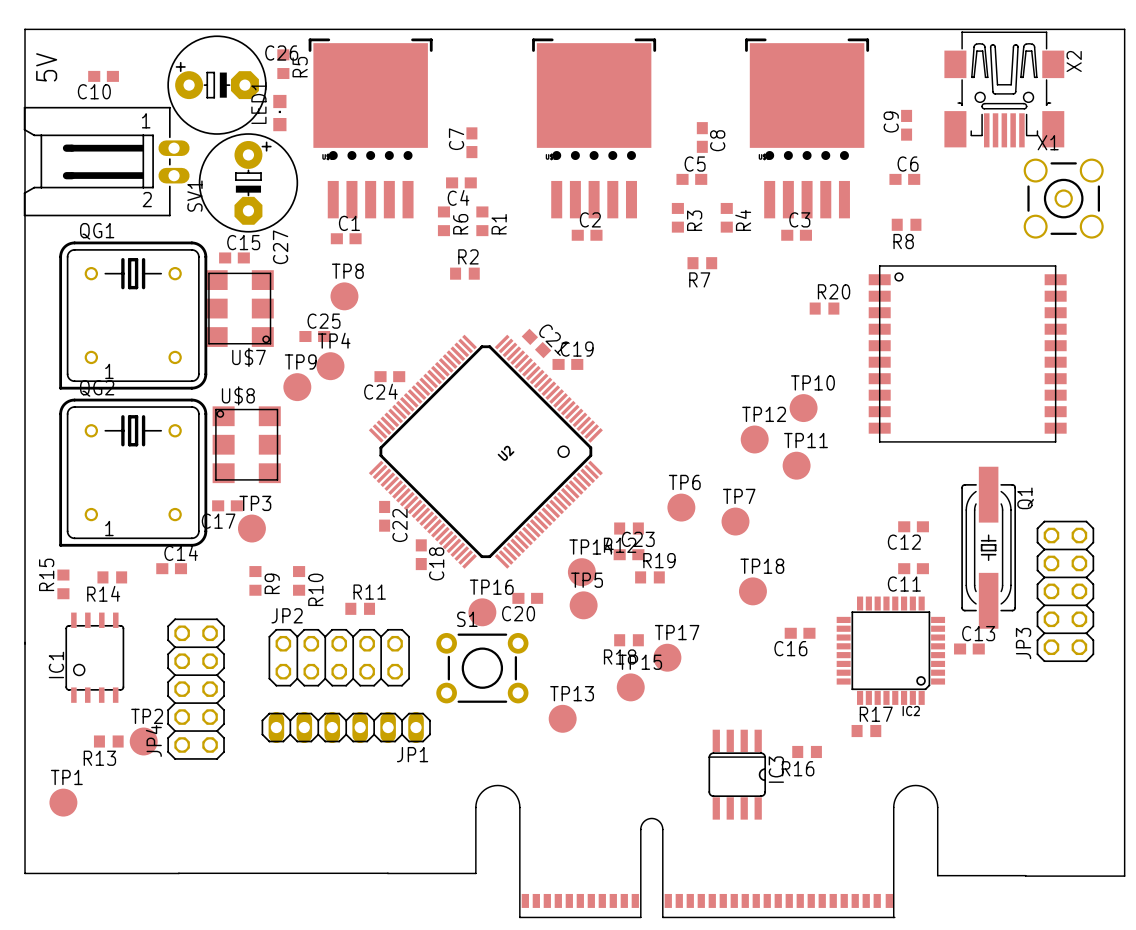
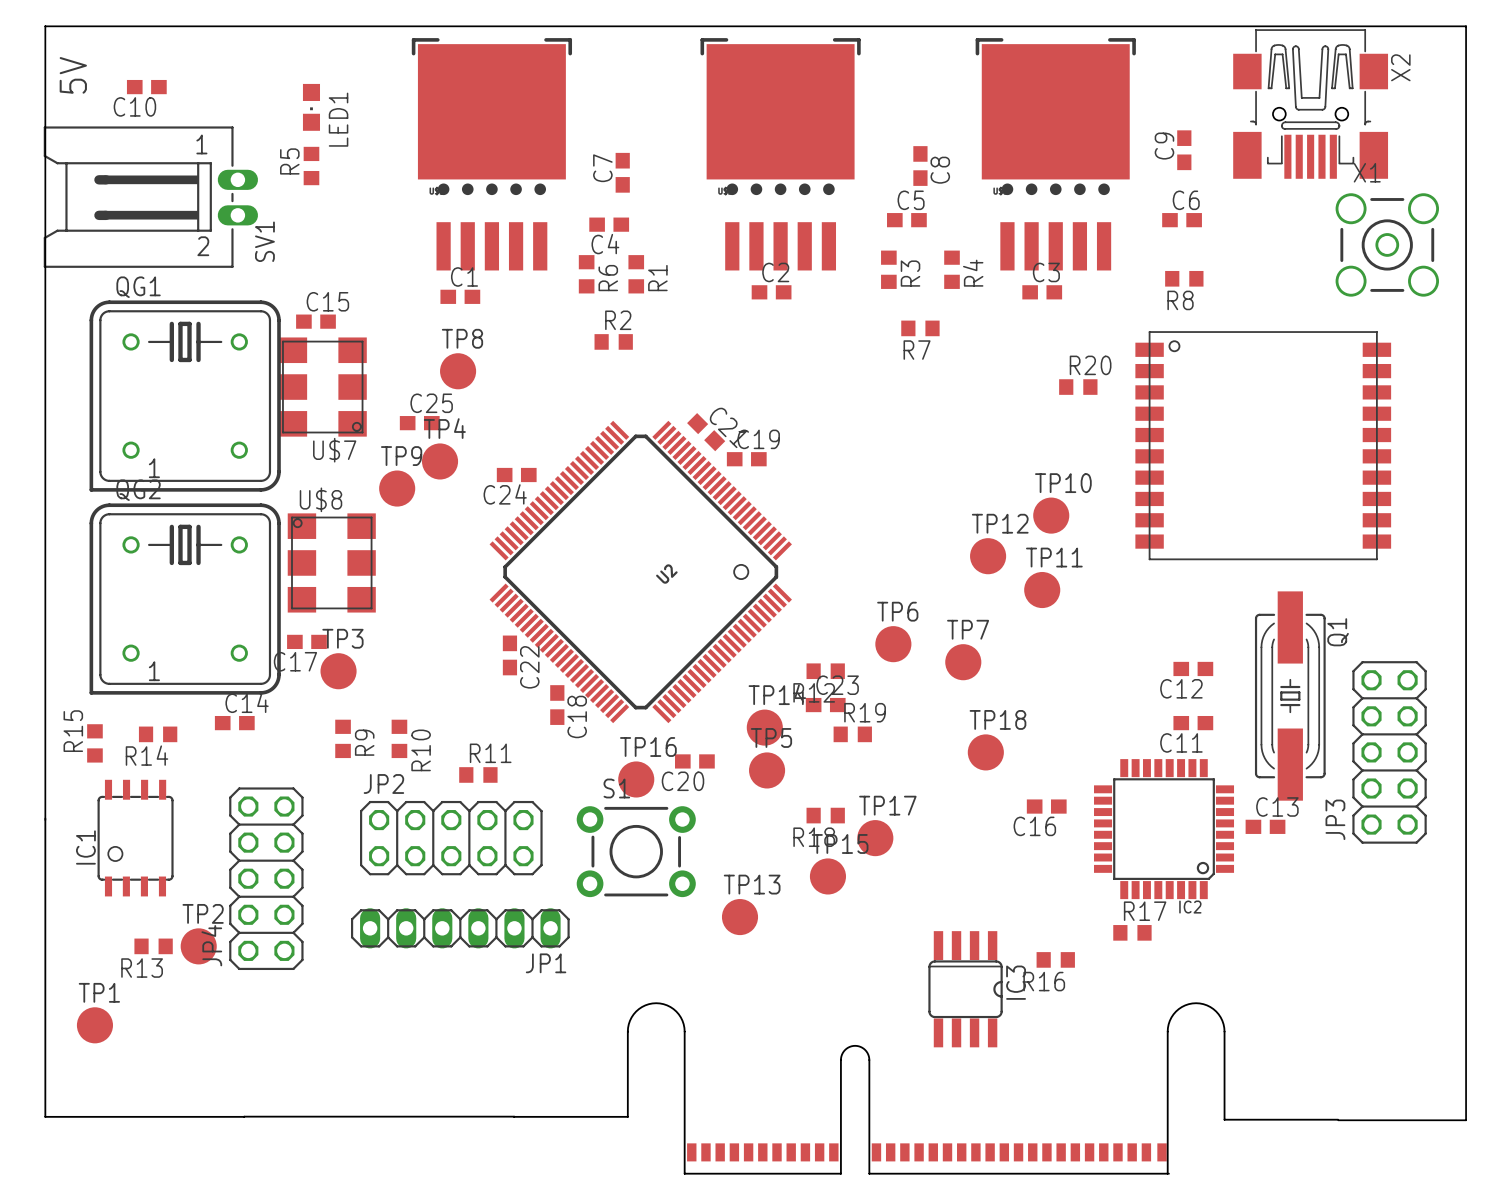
R5 position: (283, 64) -> (311, 166)
R5 name position: R5 (300, 67) -> R5 (289, 161)
C26: (217, 85) -> none
LED1 rotation: 0° (279, 113) -> 180° (311, 107)
LED1 position: (279, 113) -> (311, 107)
C27: (248, 182) -> none

